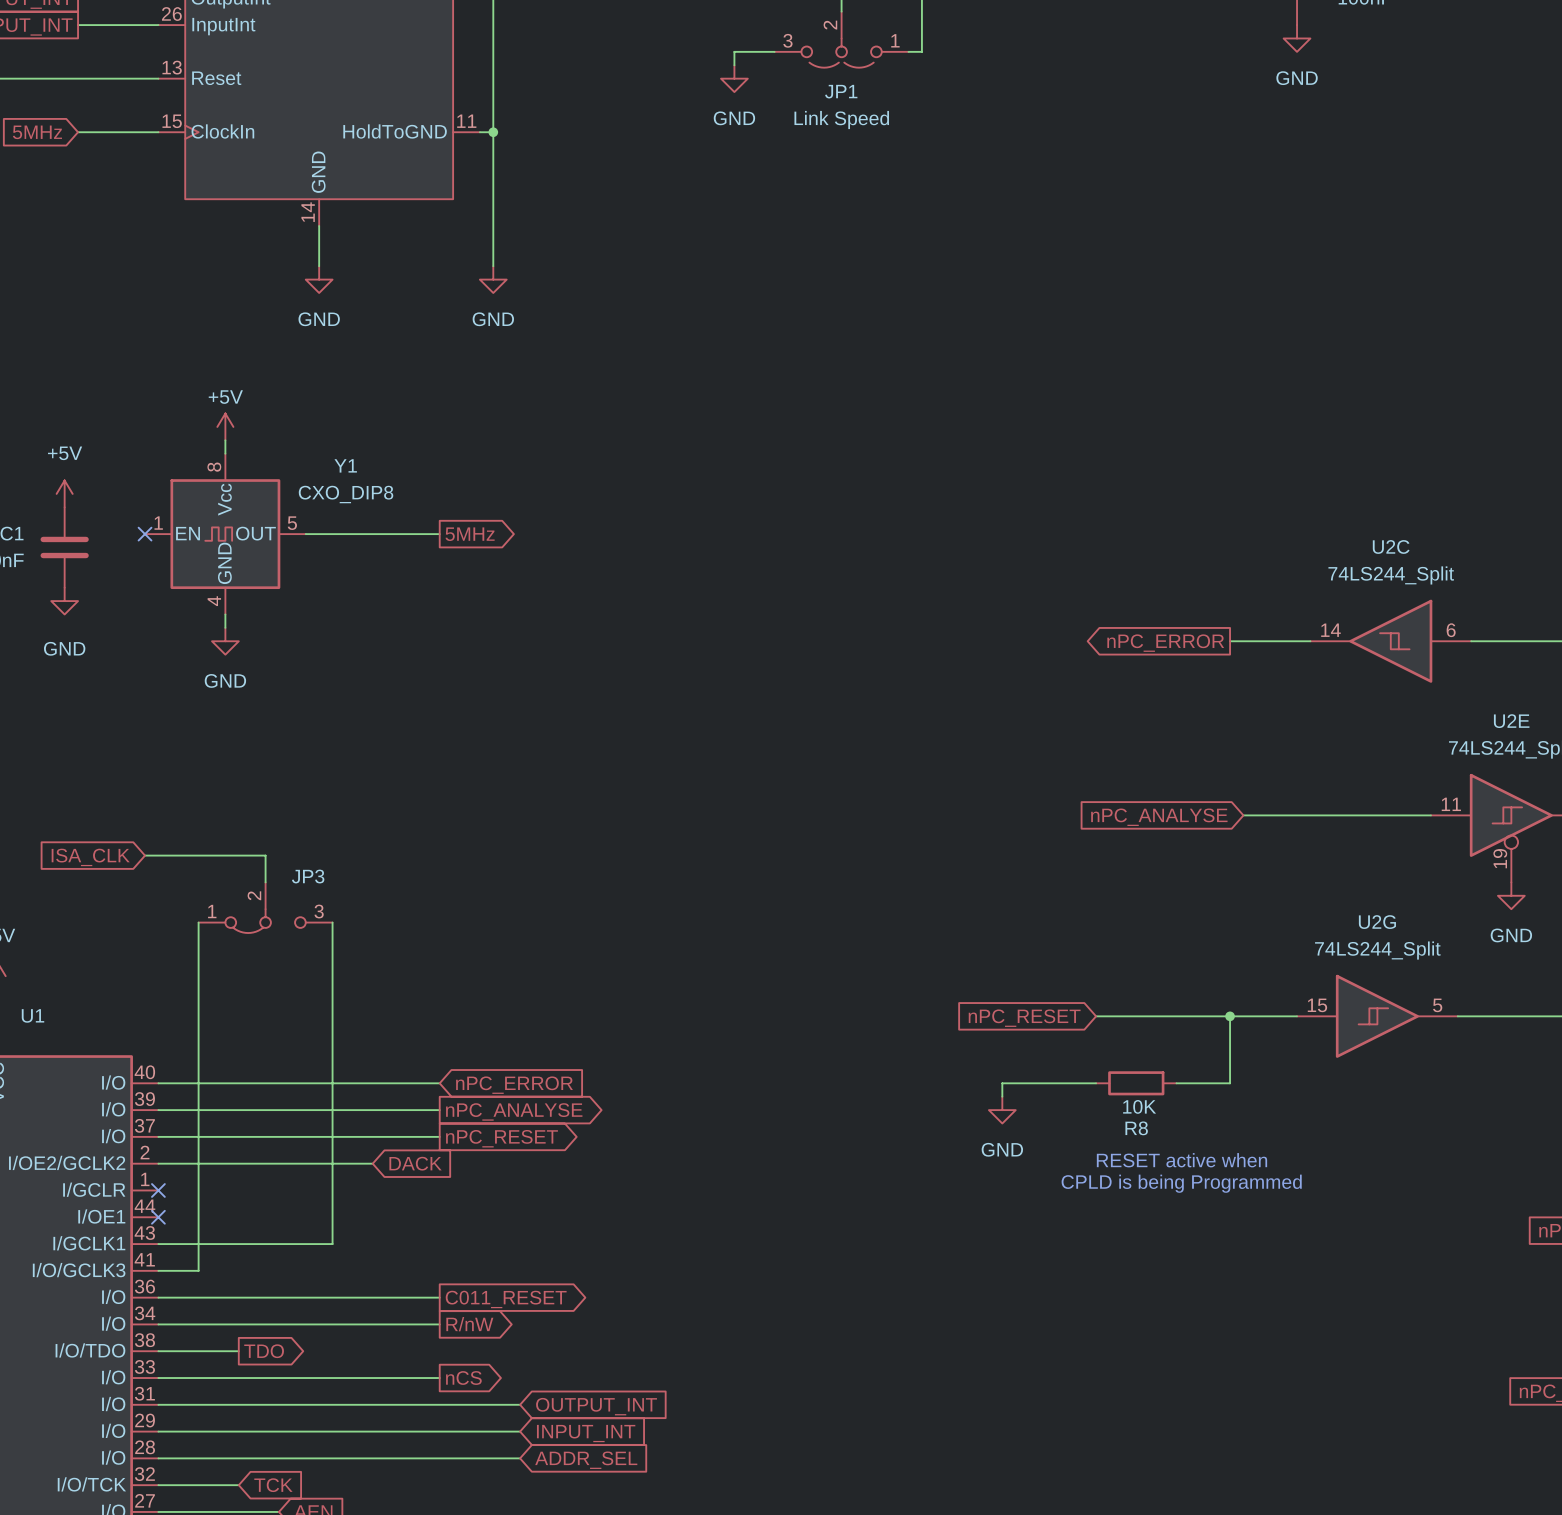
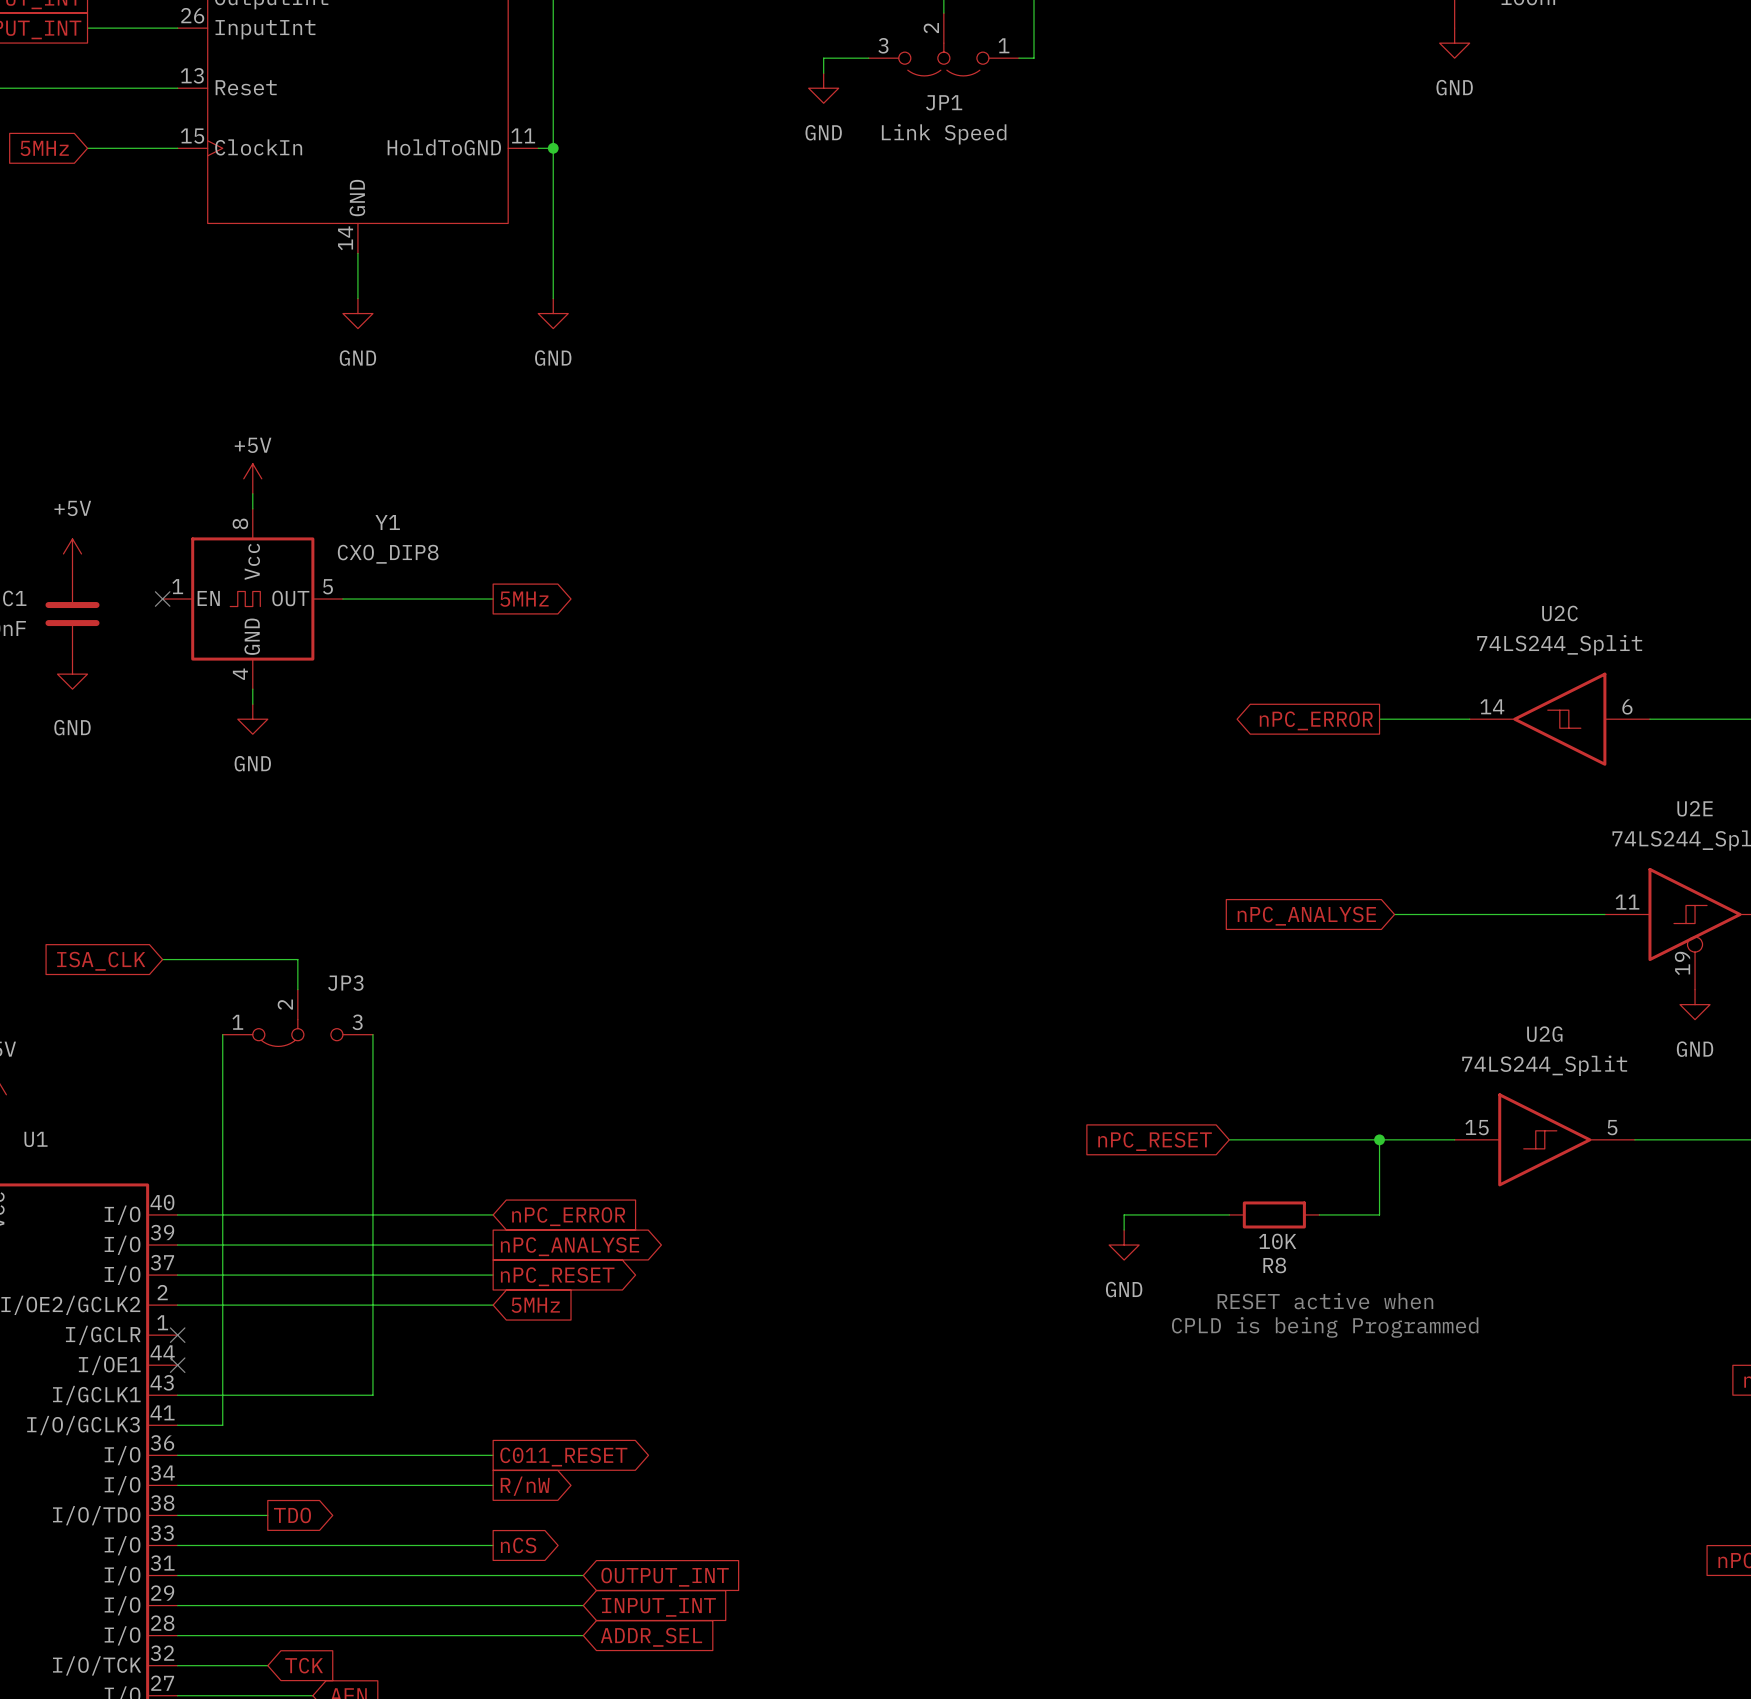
wire: none -> (418, 1305) (493, 1305)
global label: DACK (415, 1163) -> none
global label: none -> 5MHz (535, 1305)

